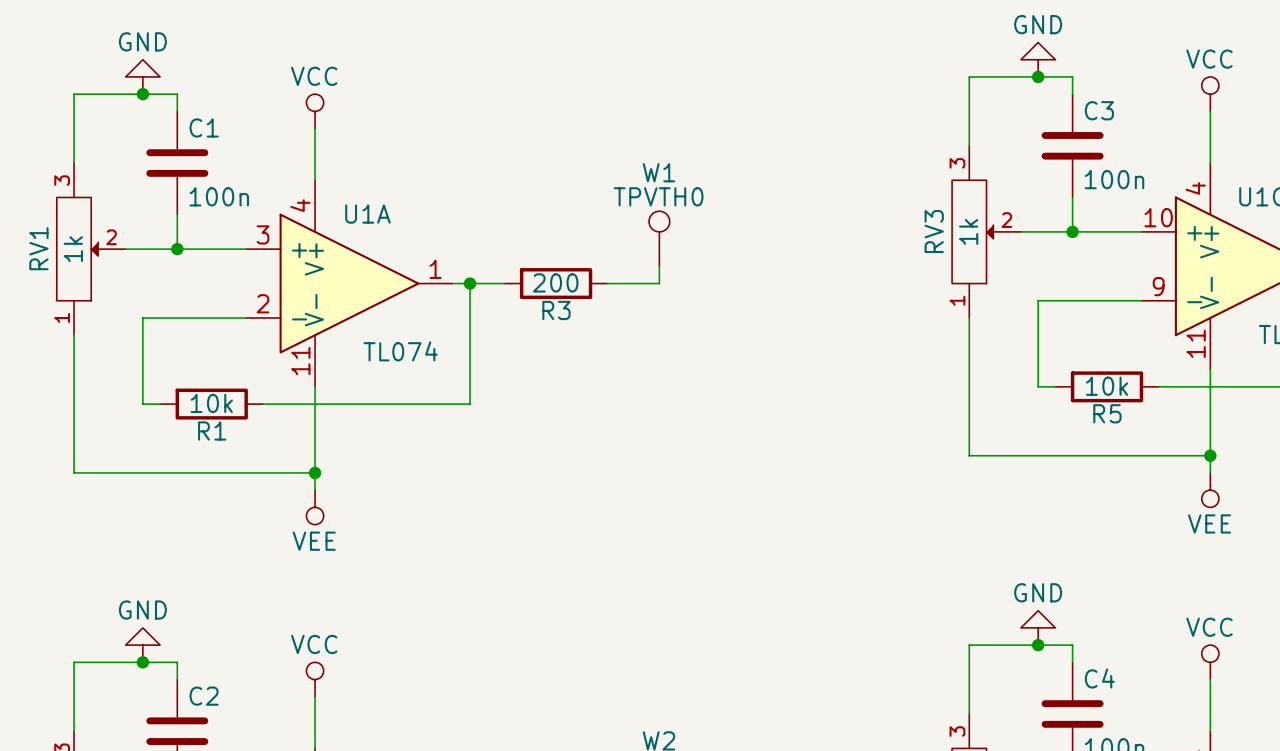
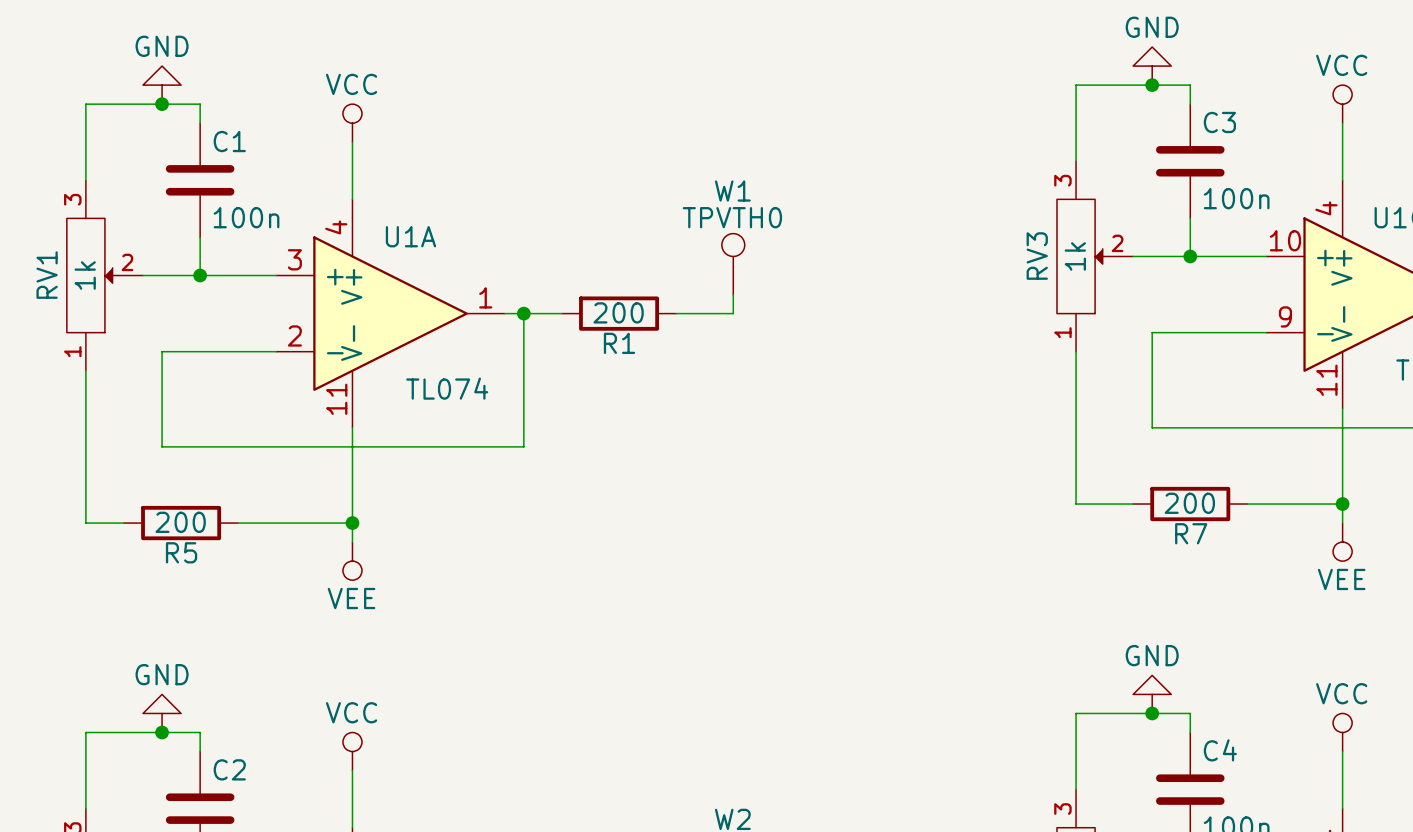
R3 name: R3 (556, 310) -> R1 (619, 343)
R5 position: (1107, 386) -> (181, 523)
R5 value: 10k (1107, 386) -> 200 (180, 522)
R1: 10k (211, 404) -> none
wire: (1020, 455) (1124, 455) -> (1171, 427) (1285, 427)
R7: none -> 200 (1190, 504)
wire: (108, 472) (211, 472) -> (181, 446) (295, 446)

